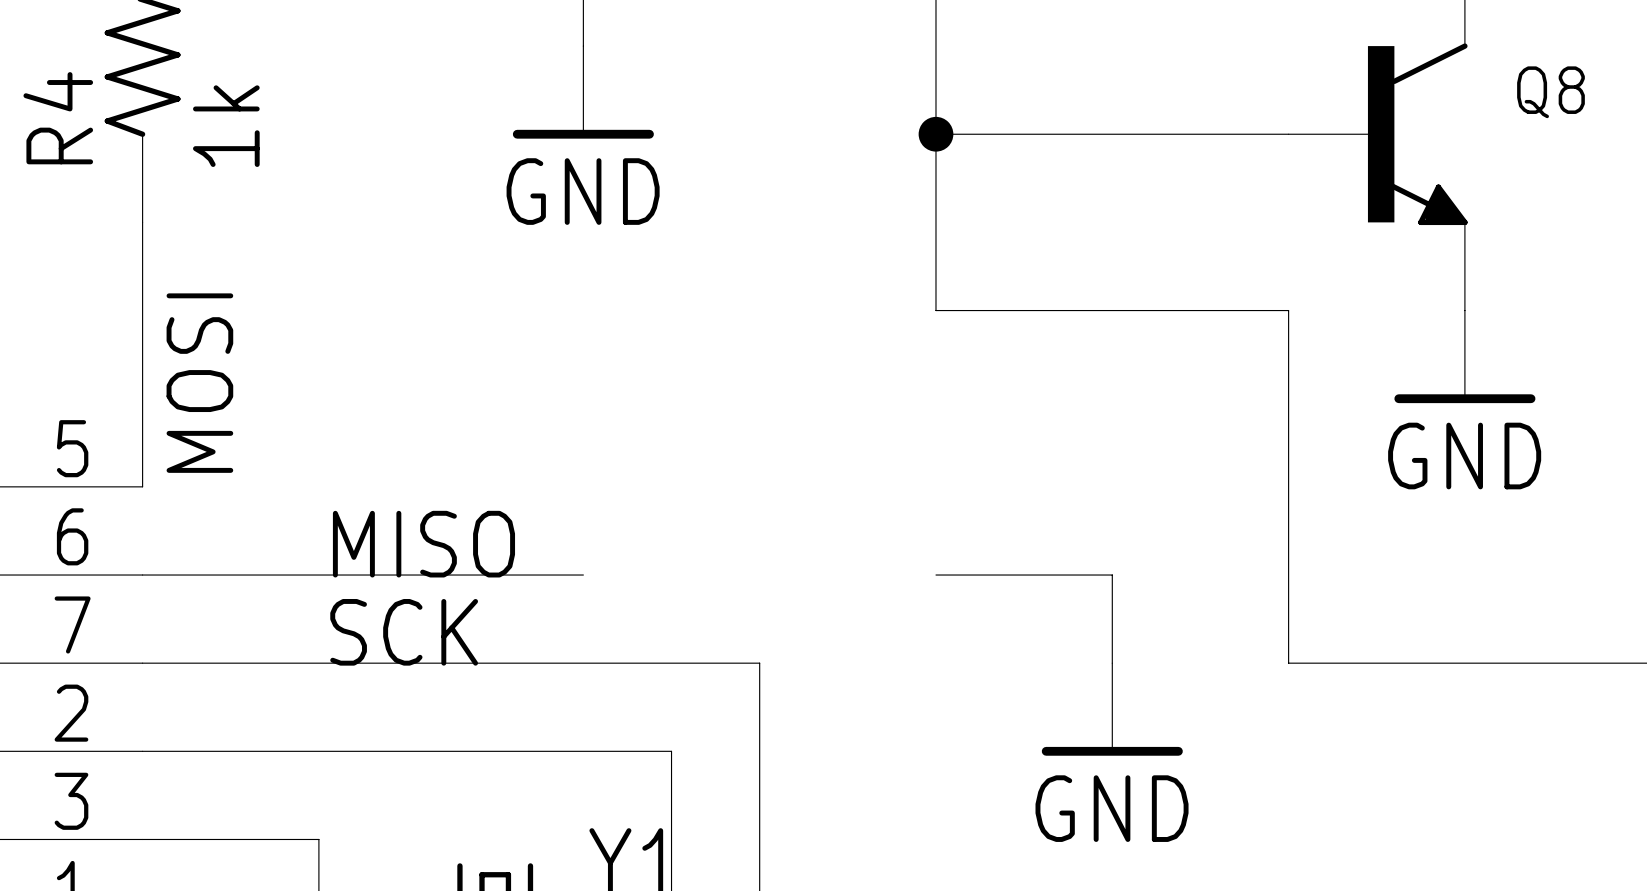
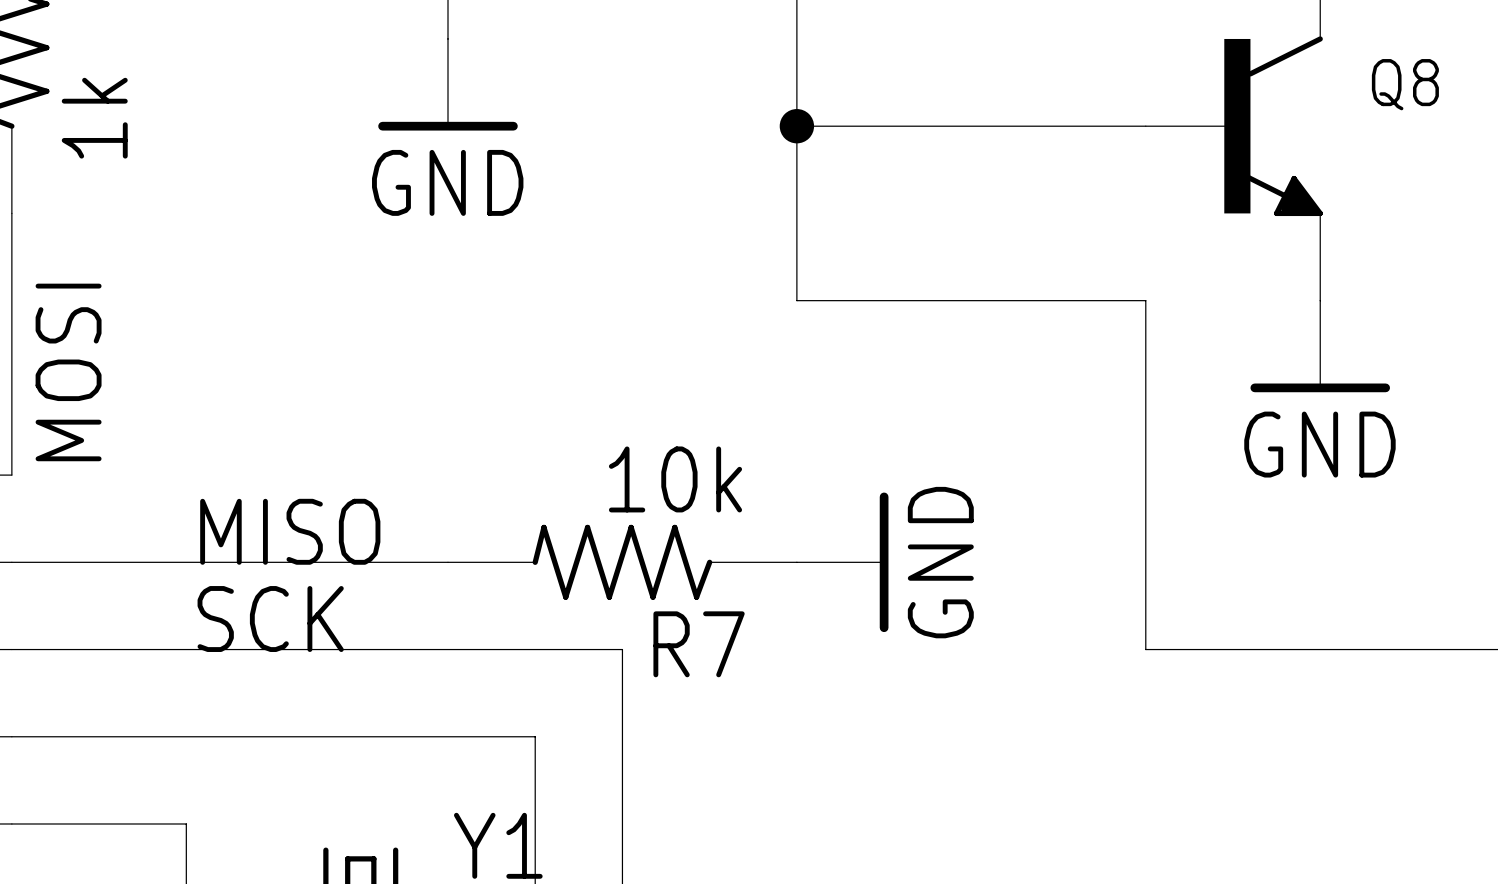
R7: none -> 10k (622, 562)
wire: (935, 575) (1112, 575) (1112, 663) -> none
power symbol position: GND (1112, 709) -> GND (842, 562)
power symbol rotation: 0° (1112, 751) -> 90° counterclockwise (884, 562)

